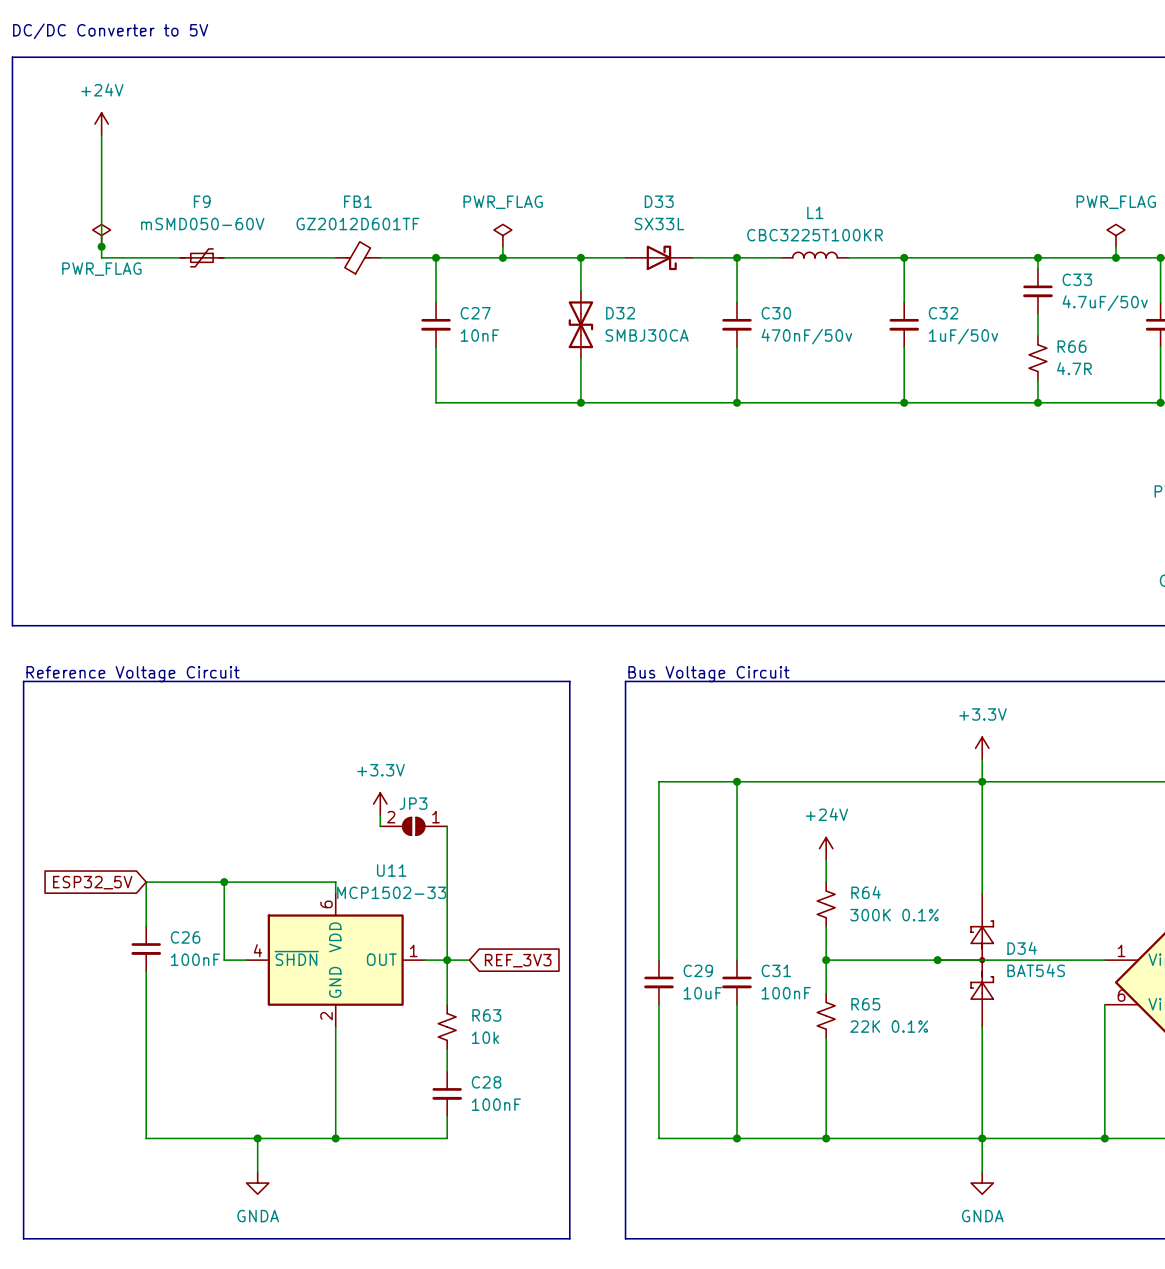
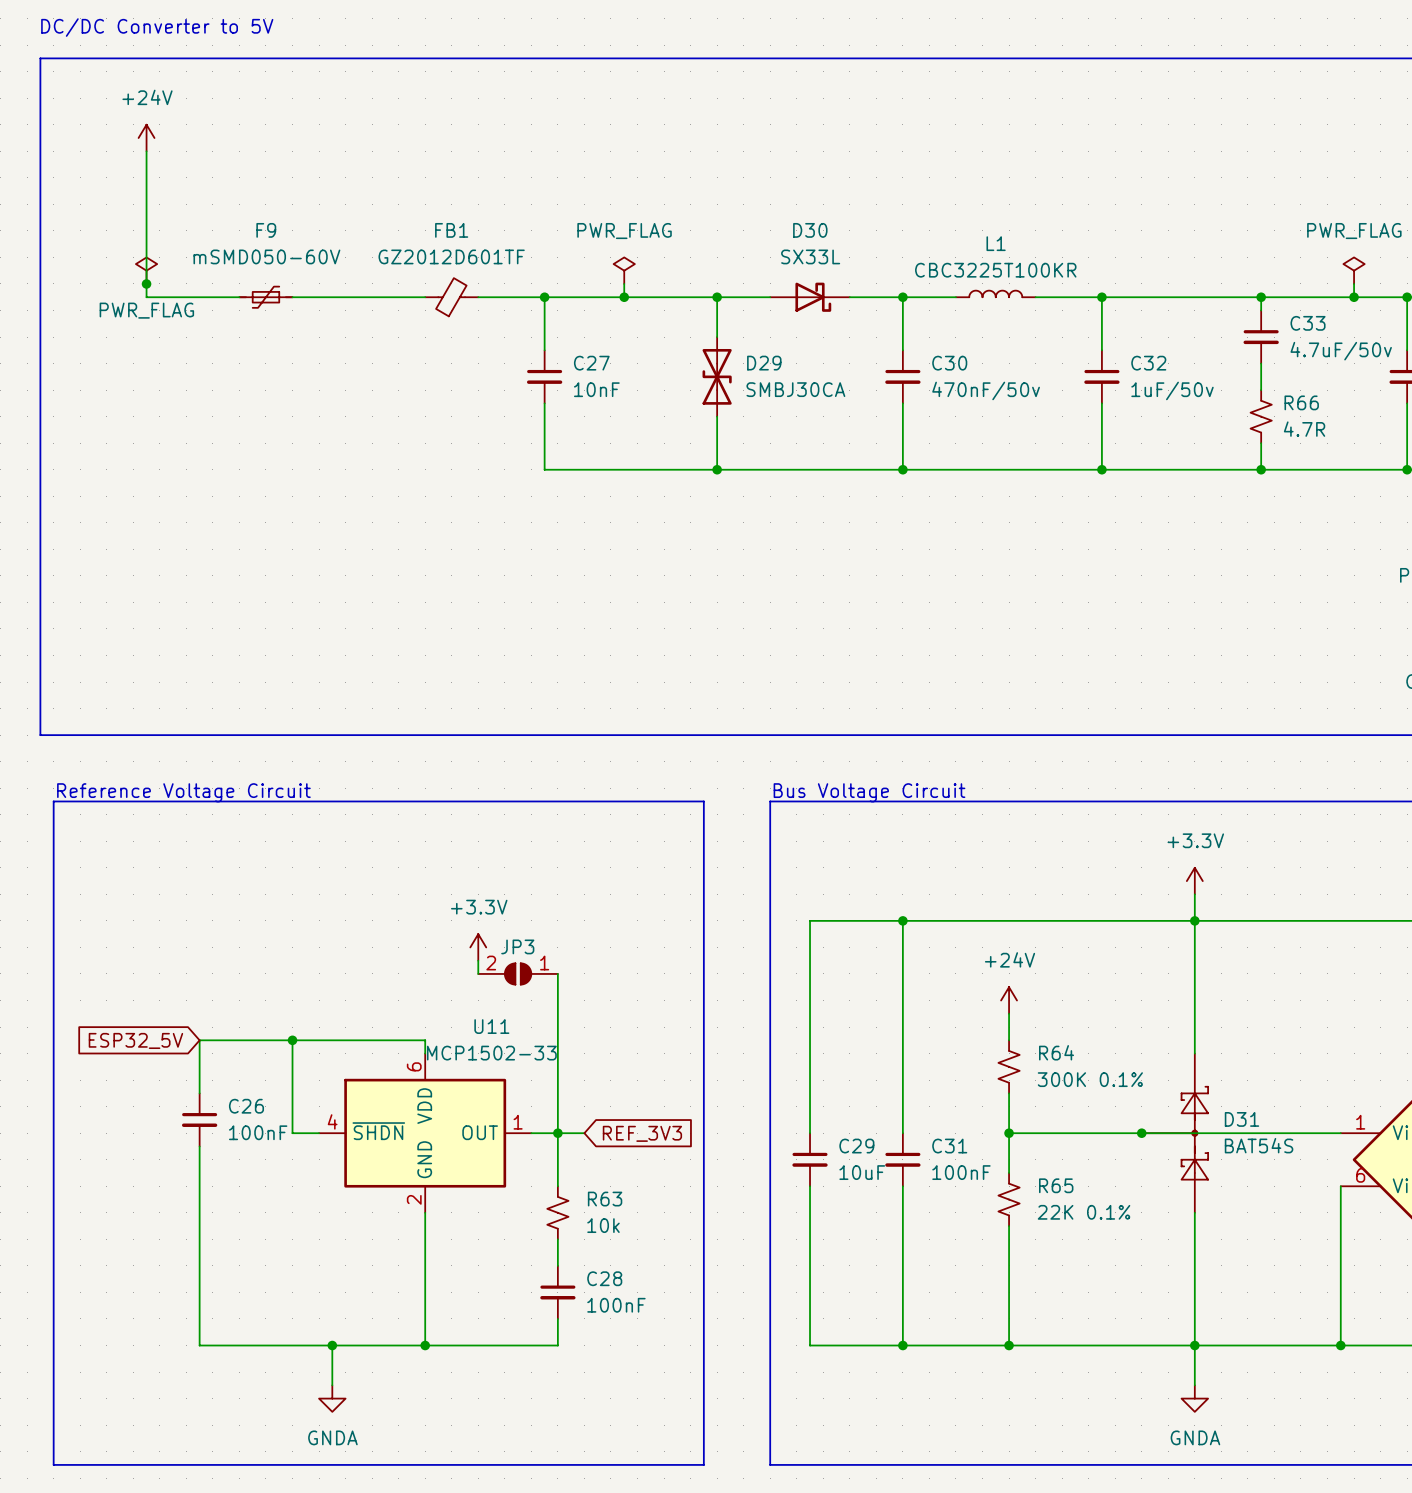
D33 name: D33 (659, 201) -> D30 (810, 230)
D32 name: D32 (620, 313) -> D29 (764, 363)
D34 name: D34 (1022, 948) -> D31 (1241, 1119)

